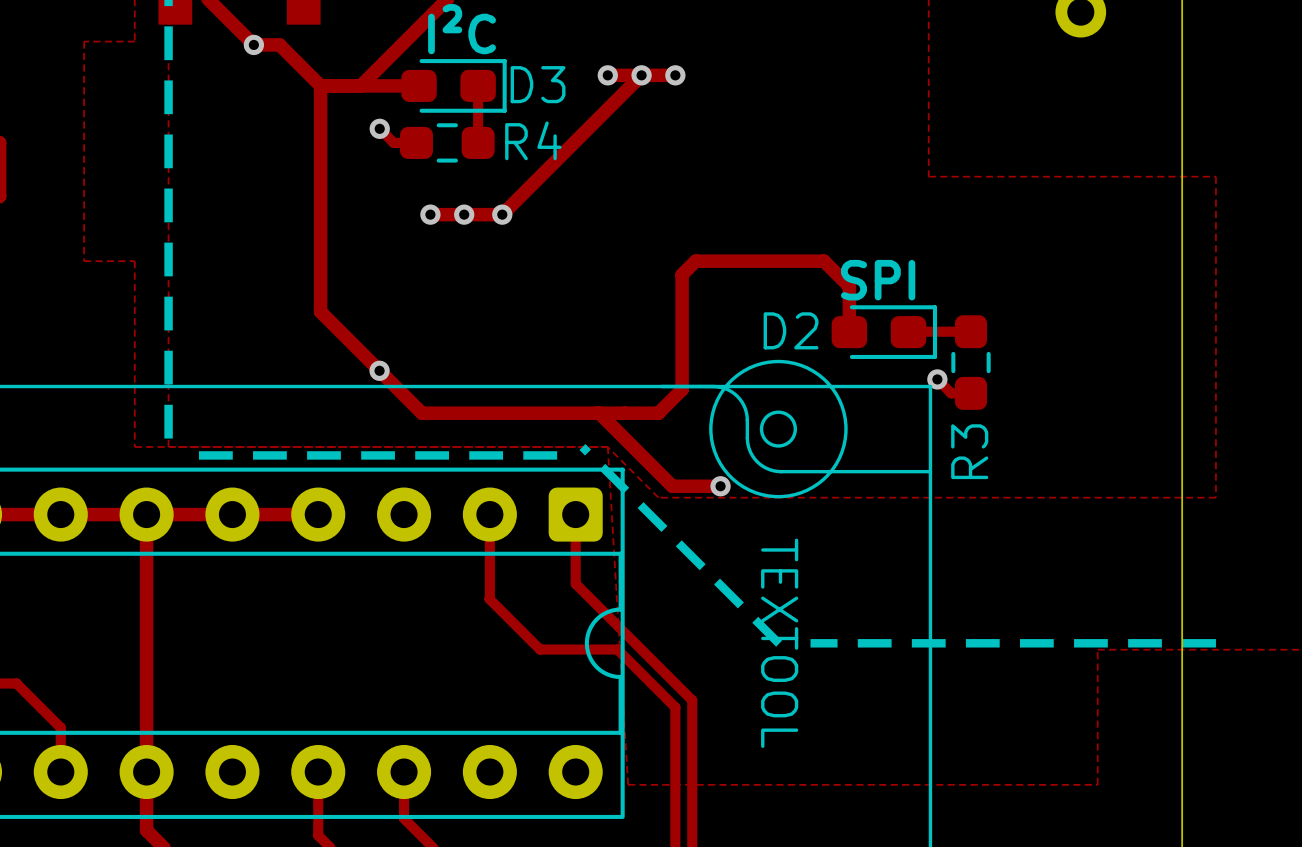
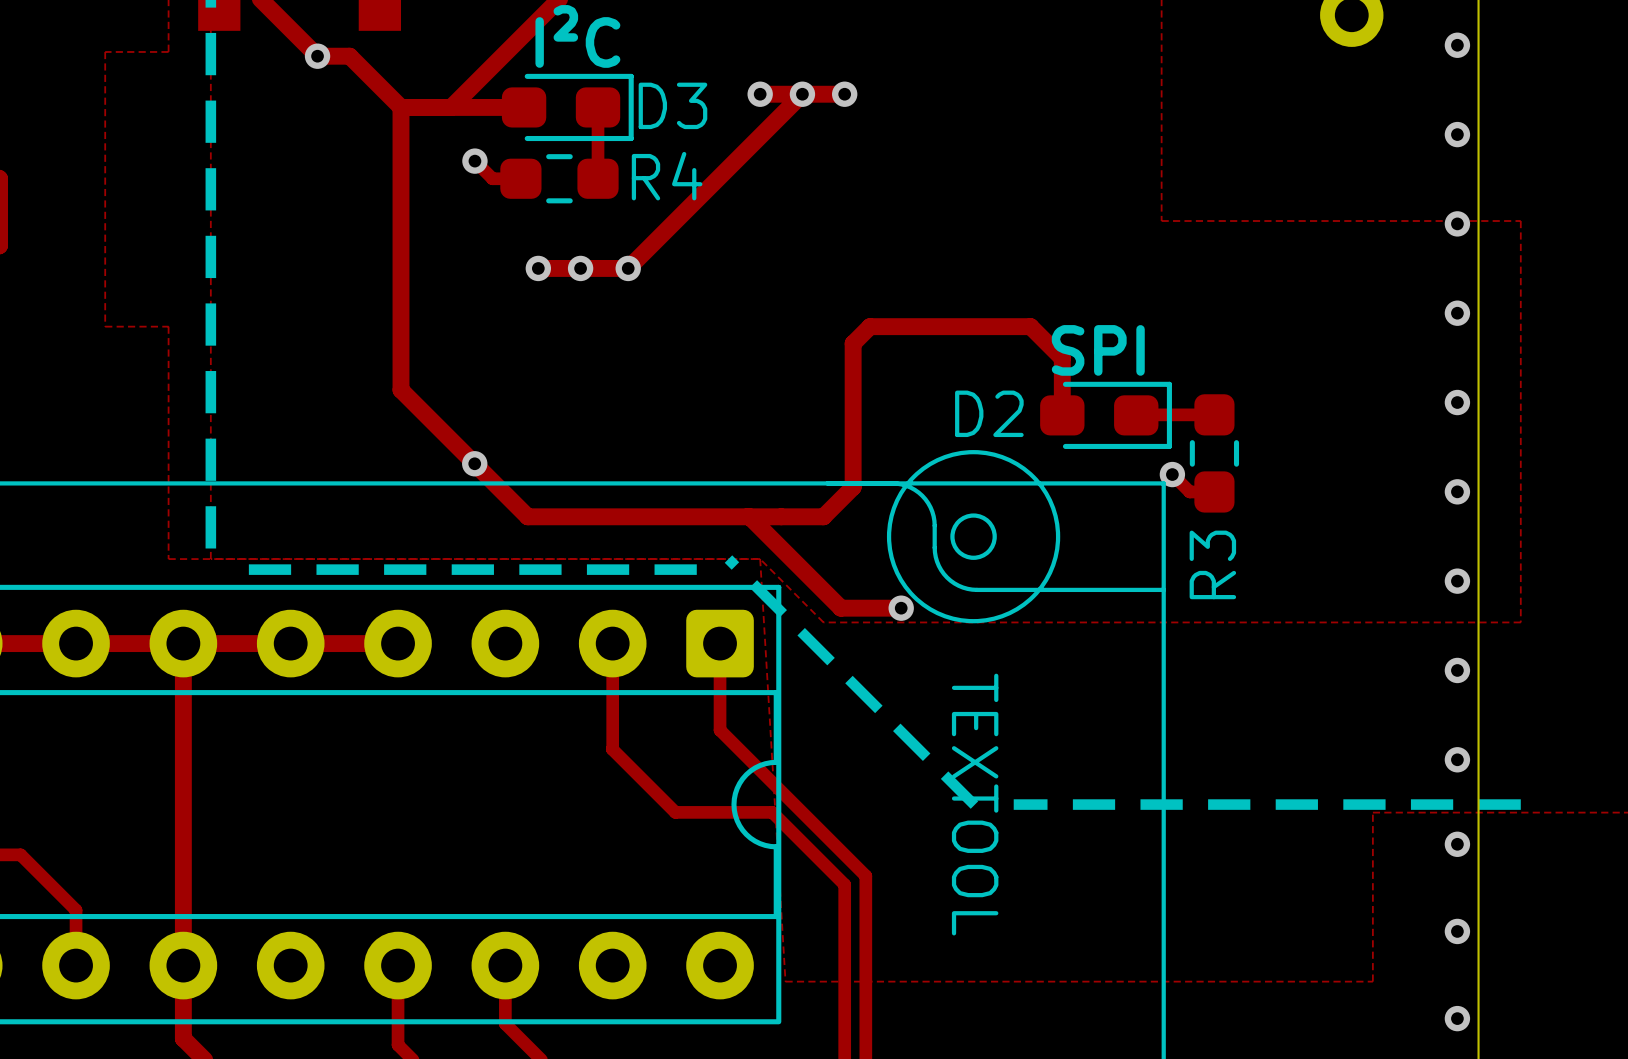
via: none -> (1457, 45)
via: none -> (1457, 134)
via: none -> (1457, 223)
via: none -> (1457, 313)
via: none -> (1457, 402)
via: none -> (1457, 491)
via: none -> (1457, 581)
via: none -> (1457, 670)
via: none -> (1457, 759)
via: none -> (1457, 844)
via: none -> (1457, 931)
via: none -> (1457, 1018)

